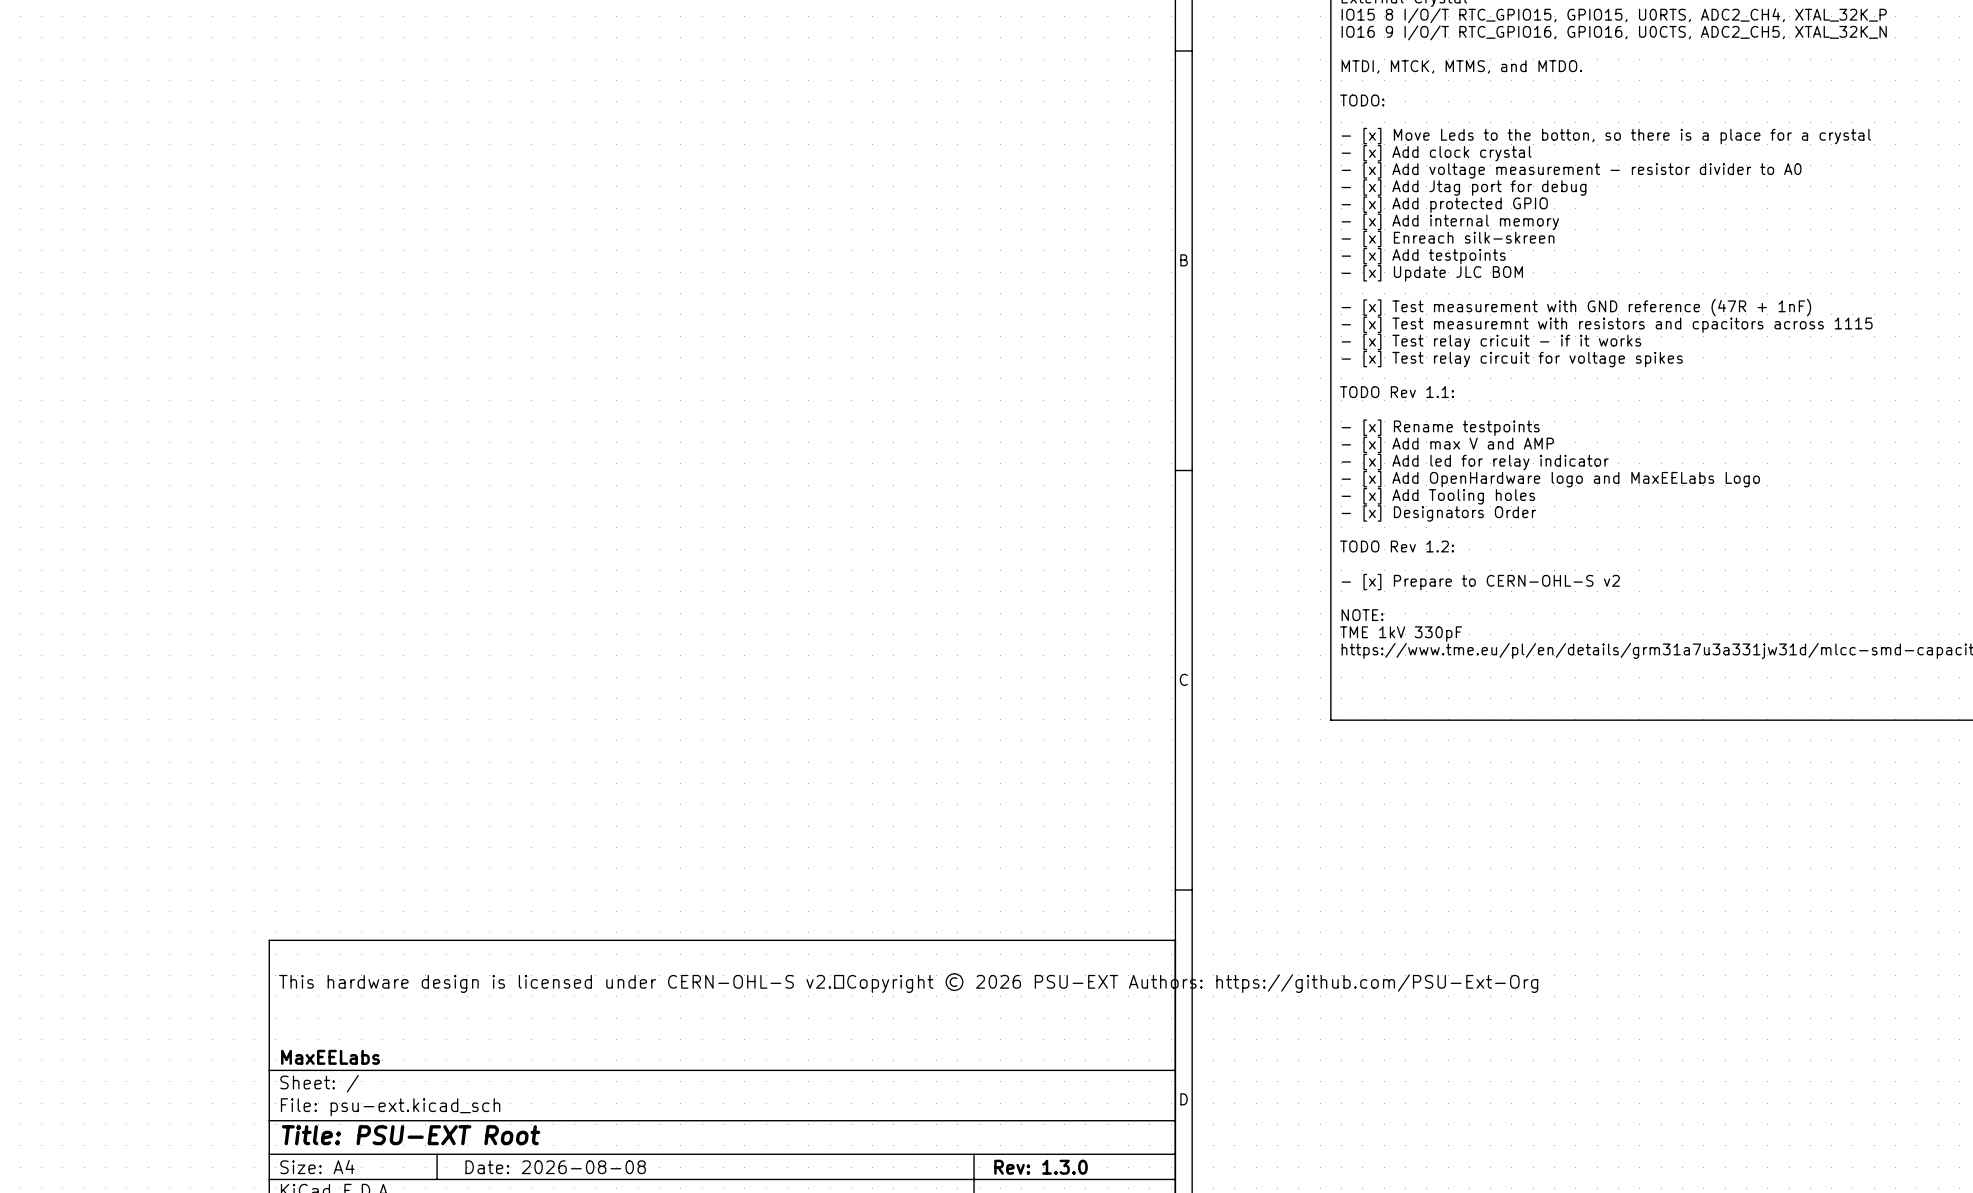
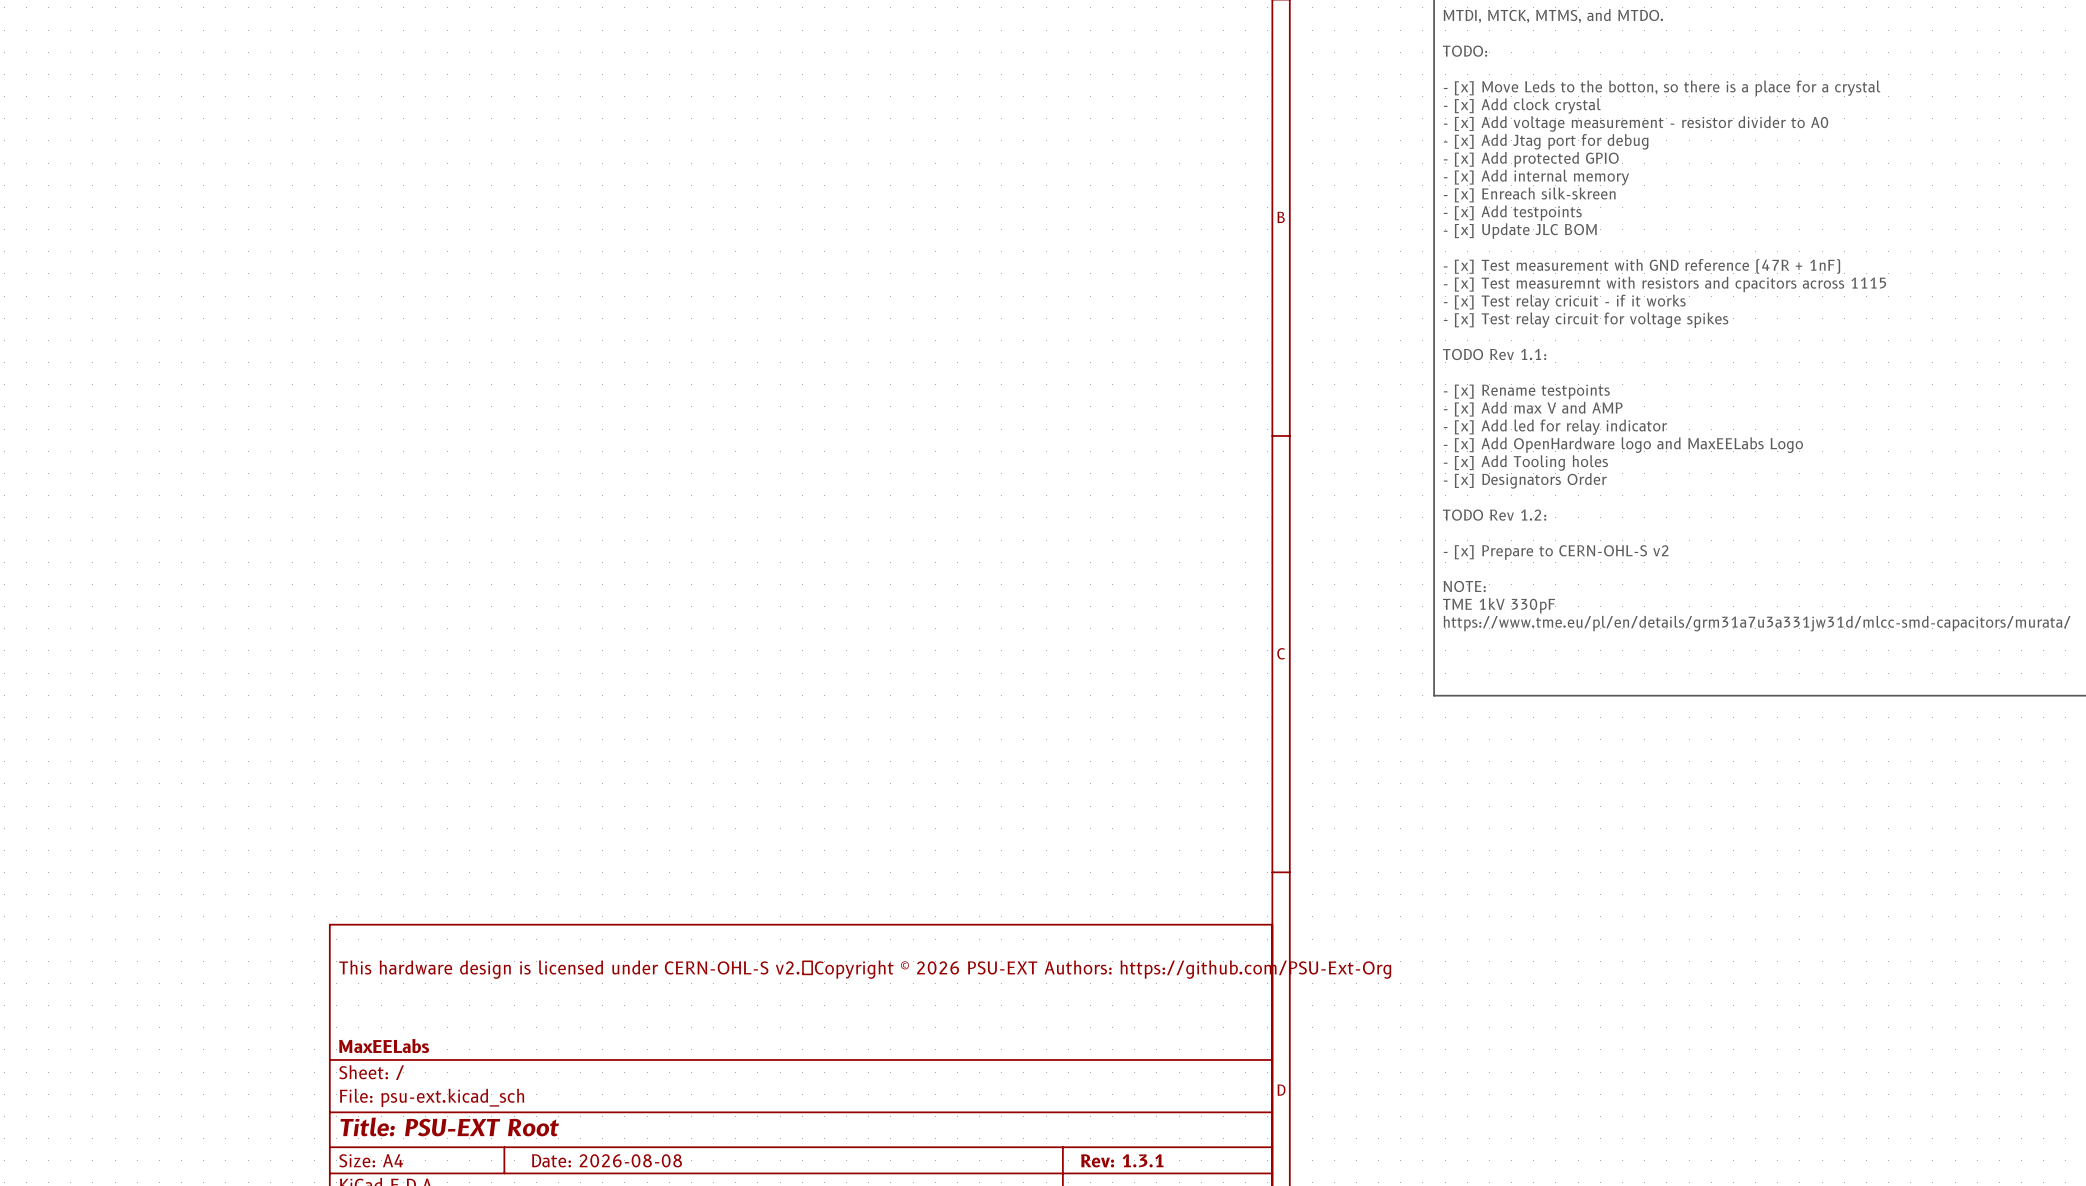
title block: Rev: 1.3.0 (1041, 1167) -> Rev: 1.3.1 (1122, 1160)

